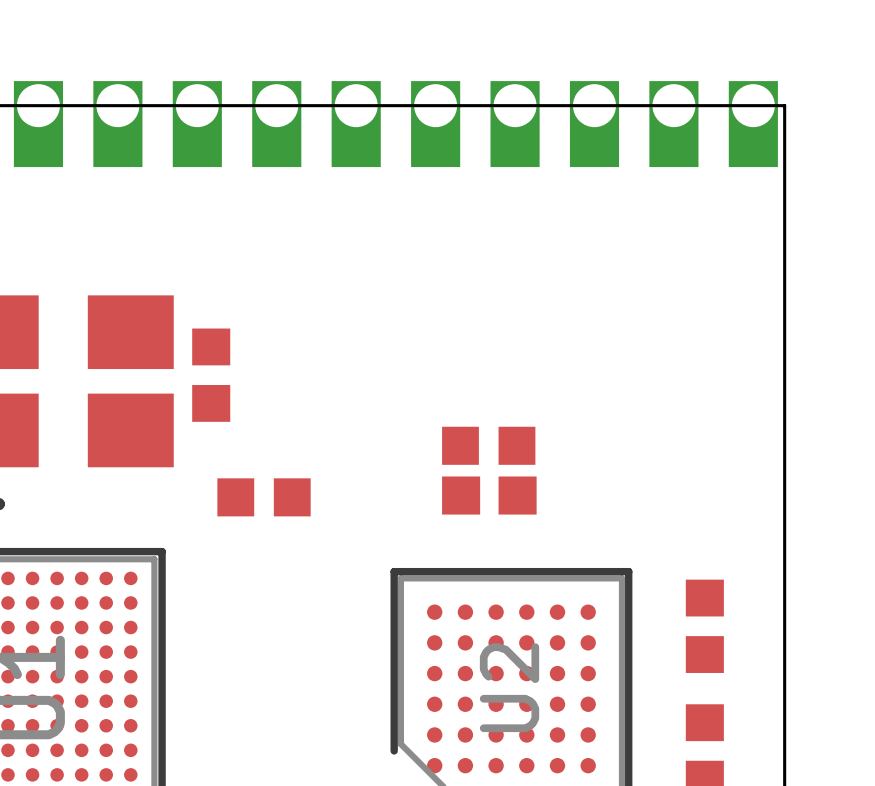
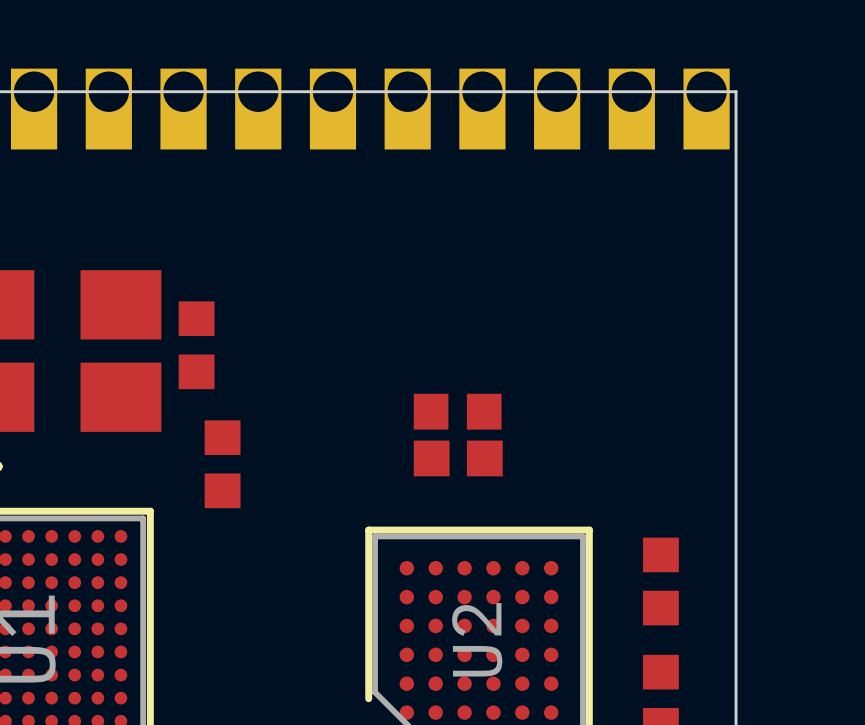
part rotation: 0° (264, 497) -> 90° clockwise (222, 464)

